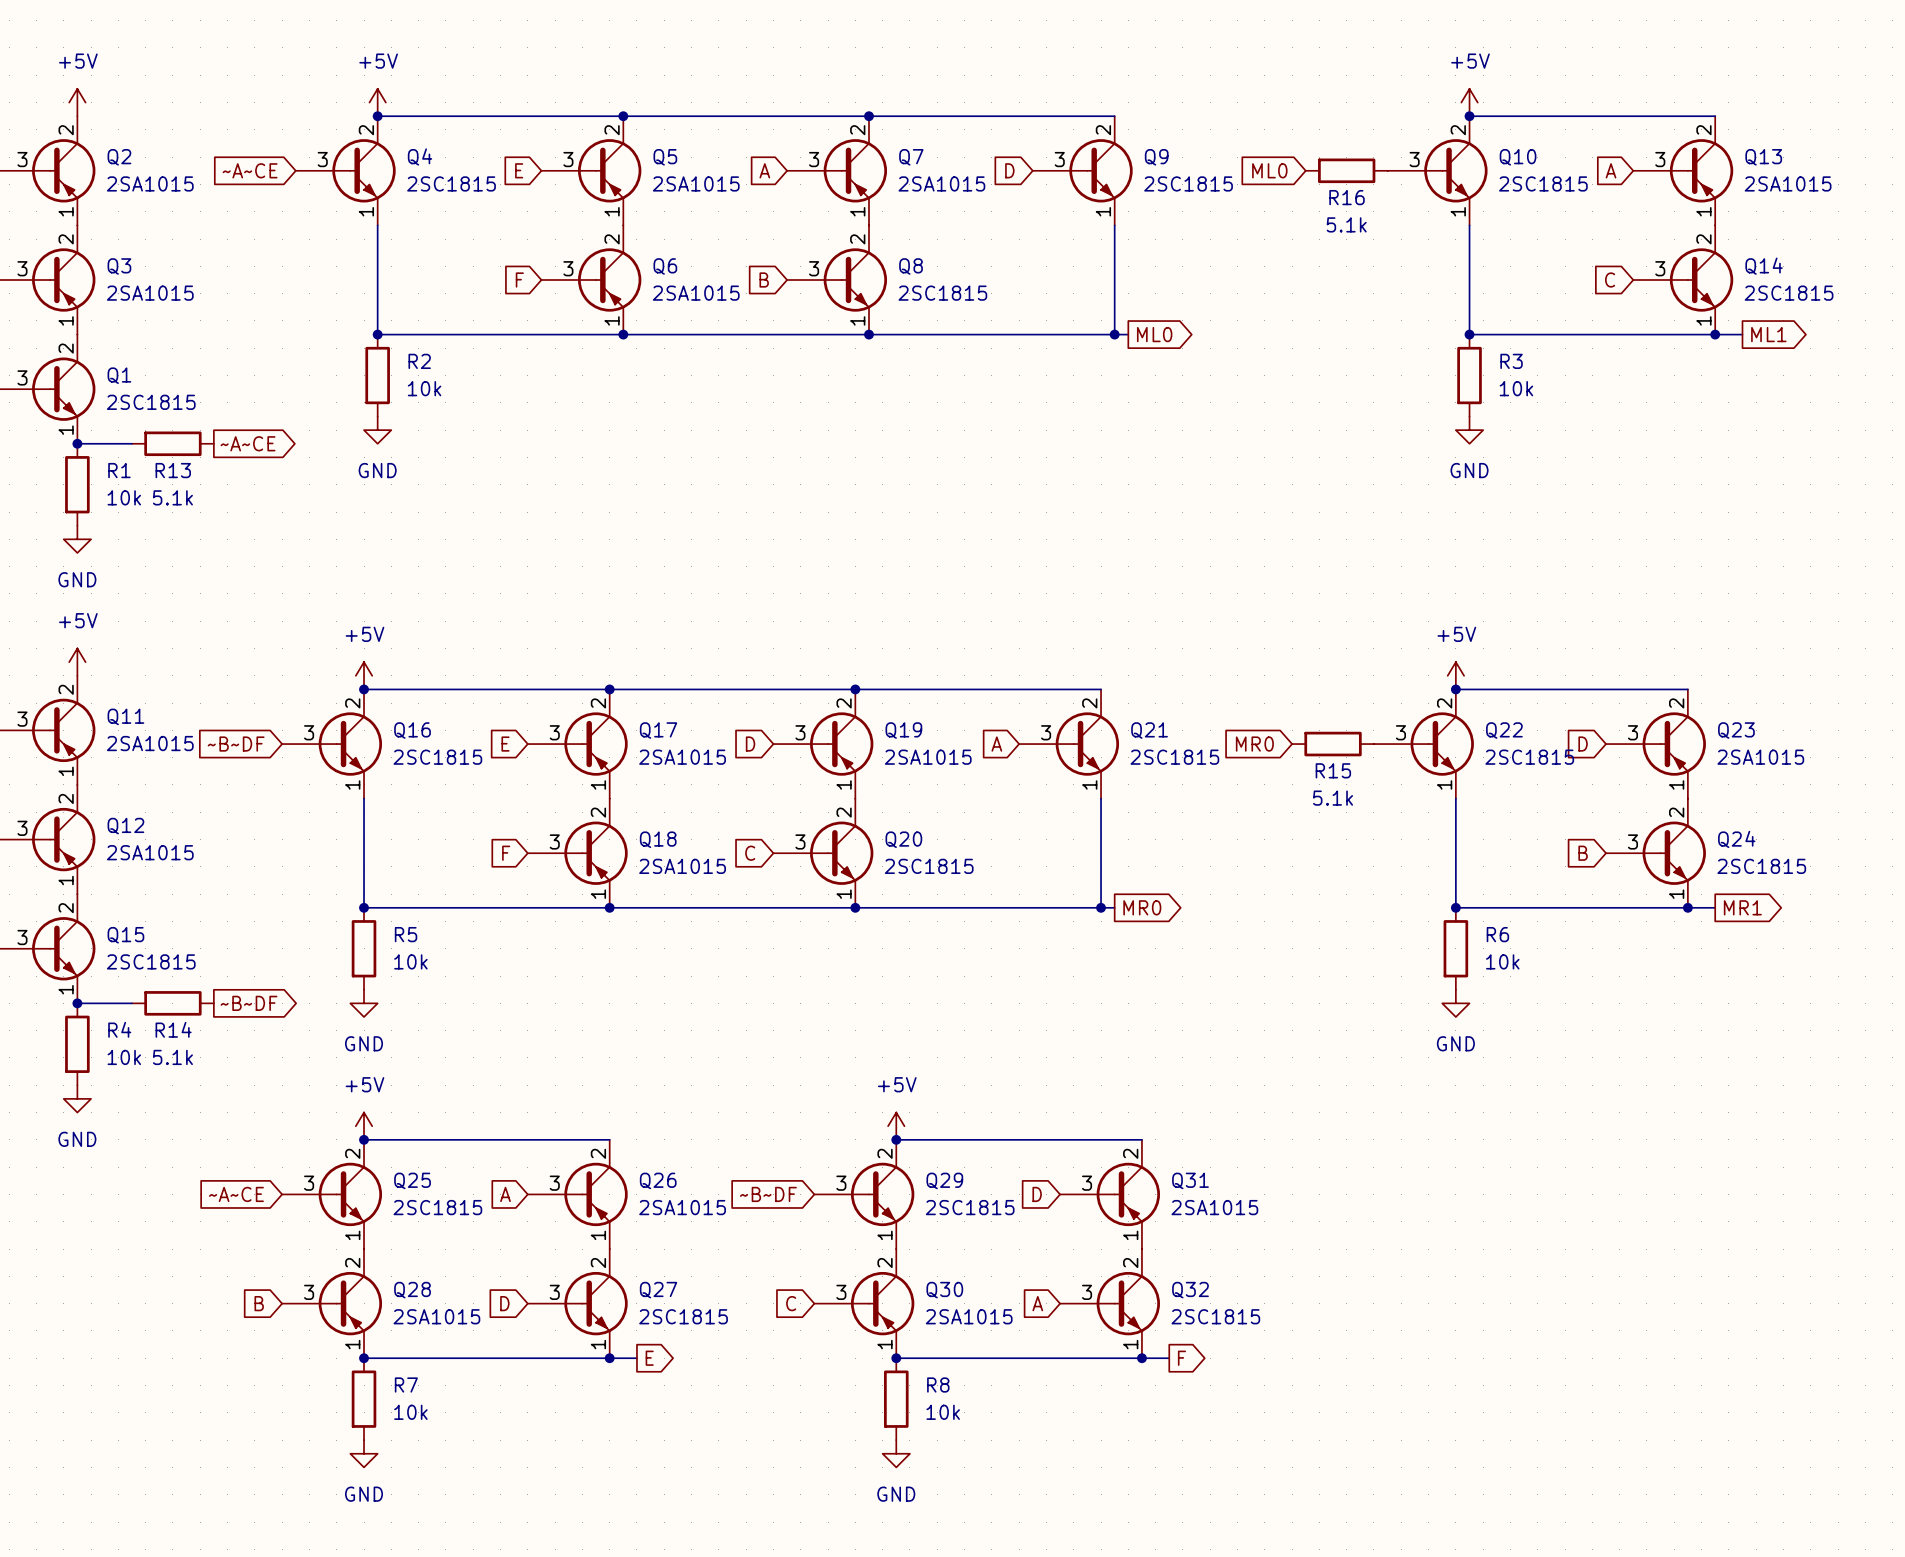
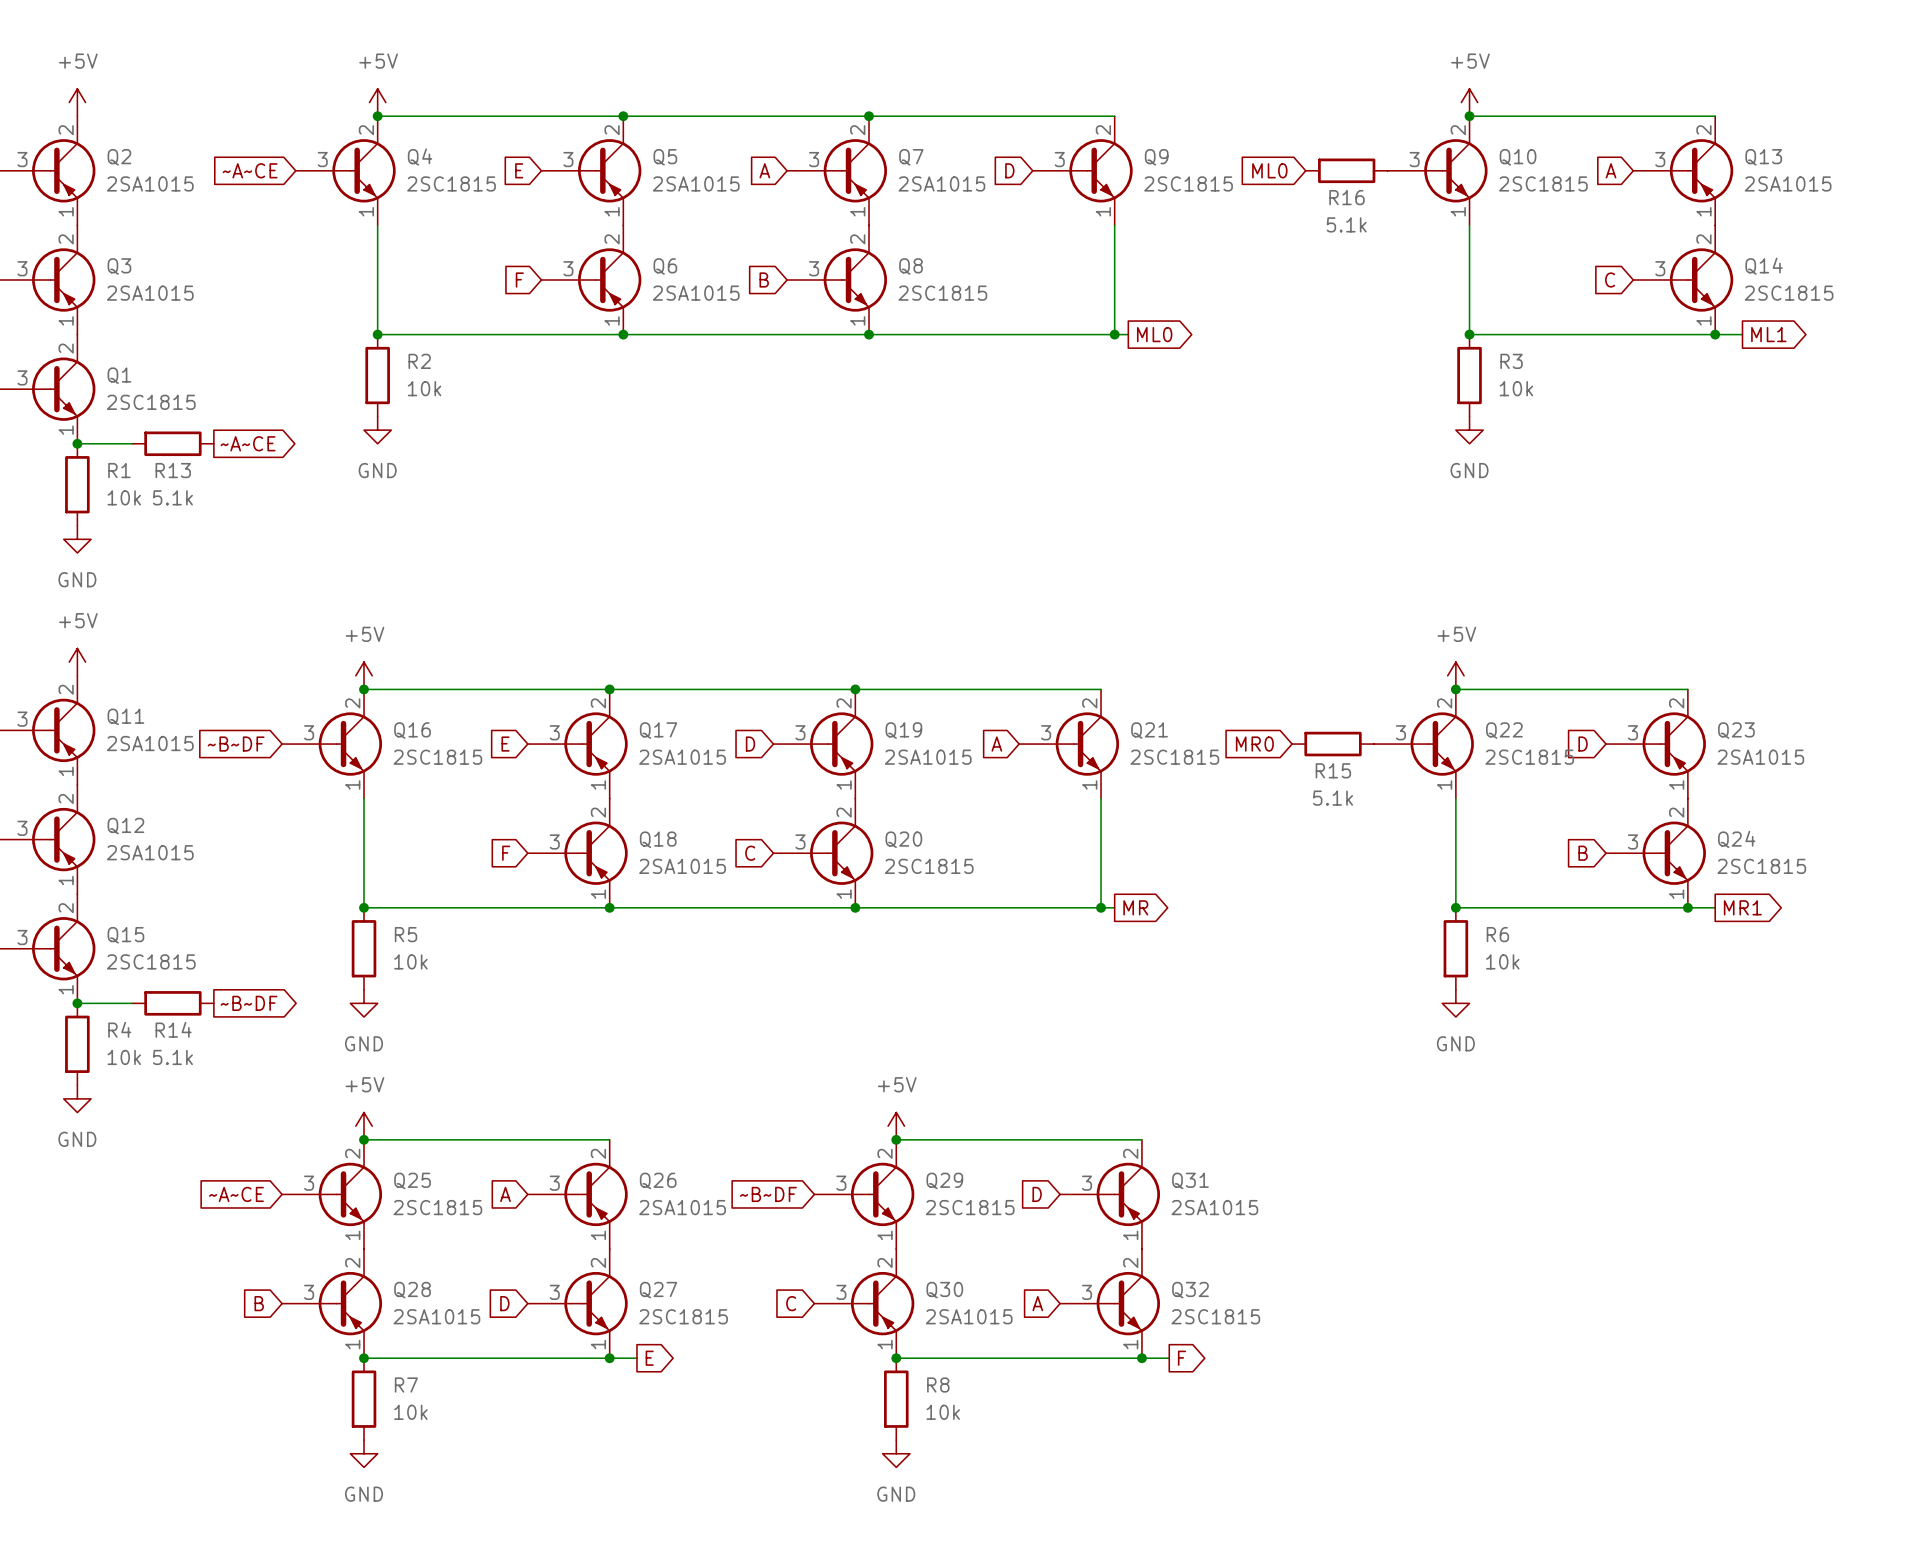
global label: MR0 (1142, 907) -> MR (1135, 907)

